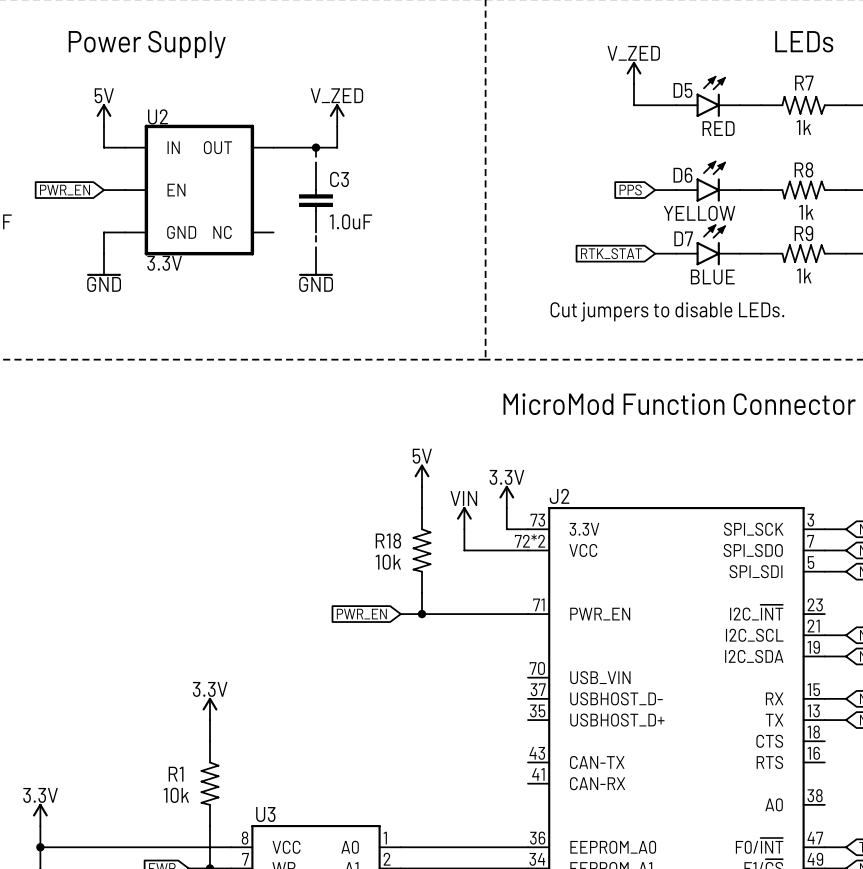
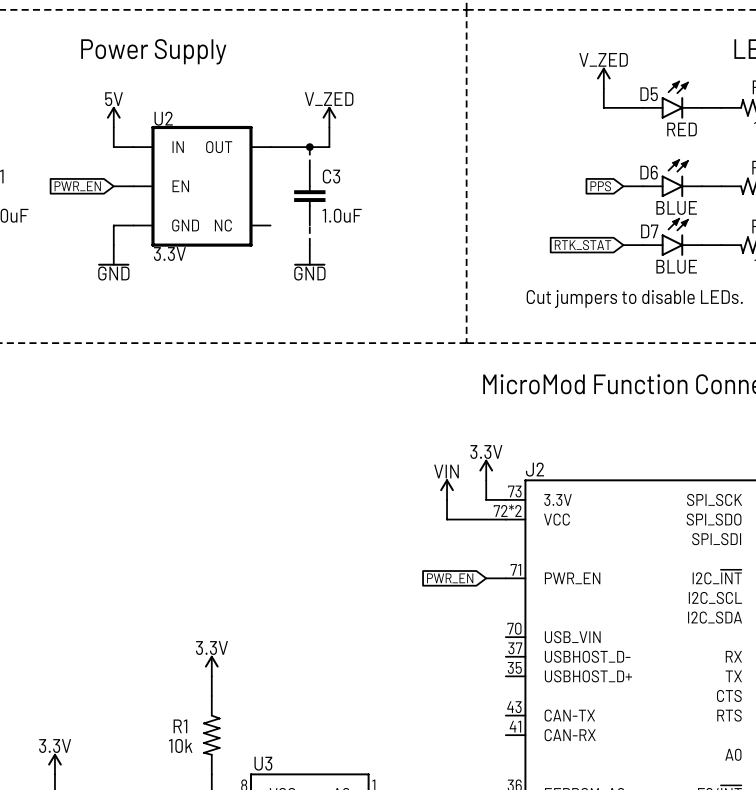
D6 value: YELLOW (699, 213) -> BLUE (676, 207)
power symbol: 5V (422, 475) -> none
wire: (422, 486) (422, 508) -> none
R18: 10k (422, 550) -> none
wire: (422, 592) (422, 614) -> none
global label position: PWR_EN (361, 614) -> PWR_EN (450, 578)
wire: (400, 614) (506, 614) -> none
junction: (422, 614) -> none

